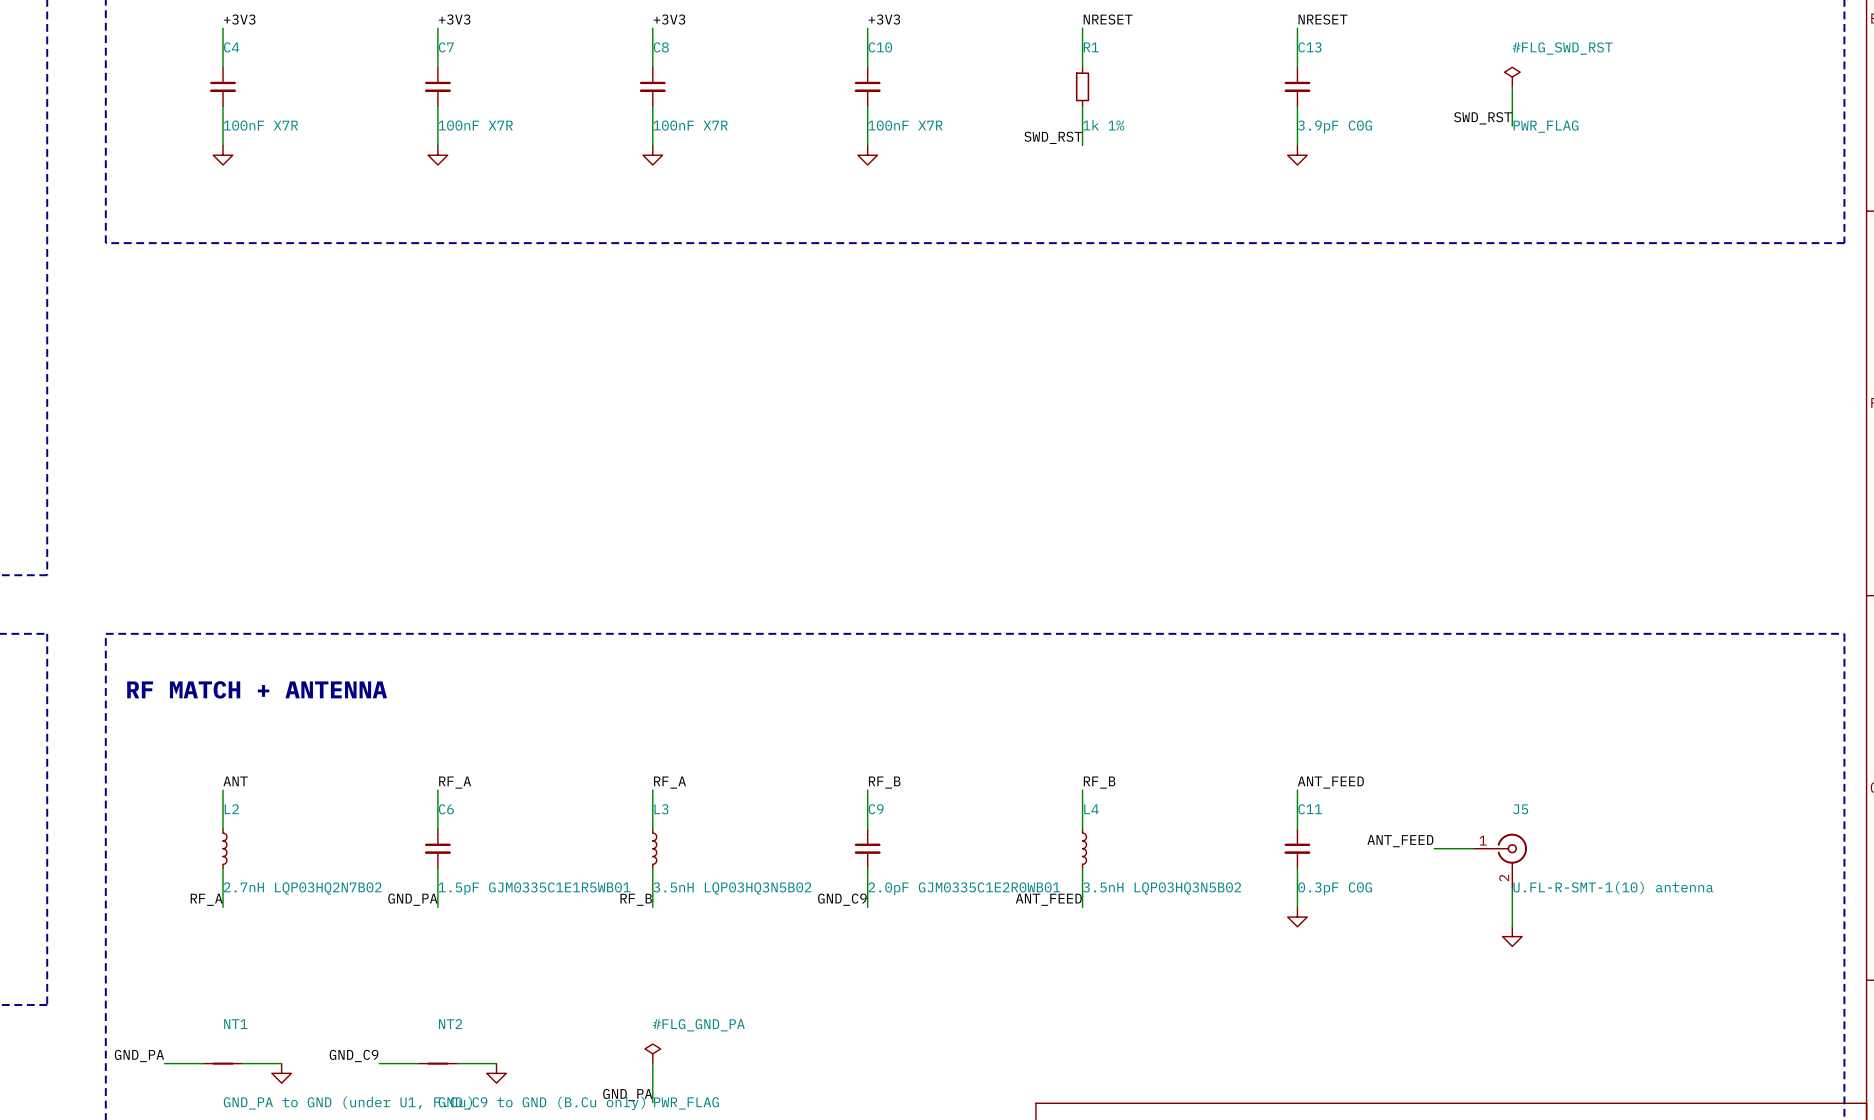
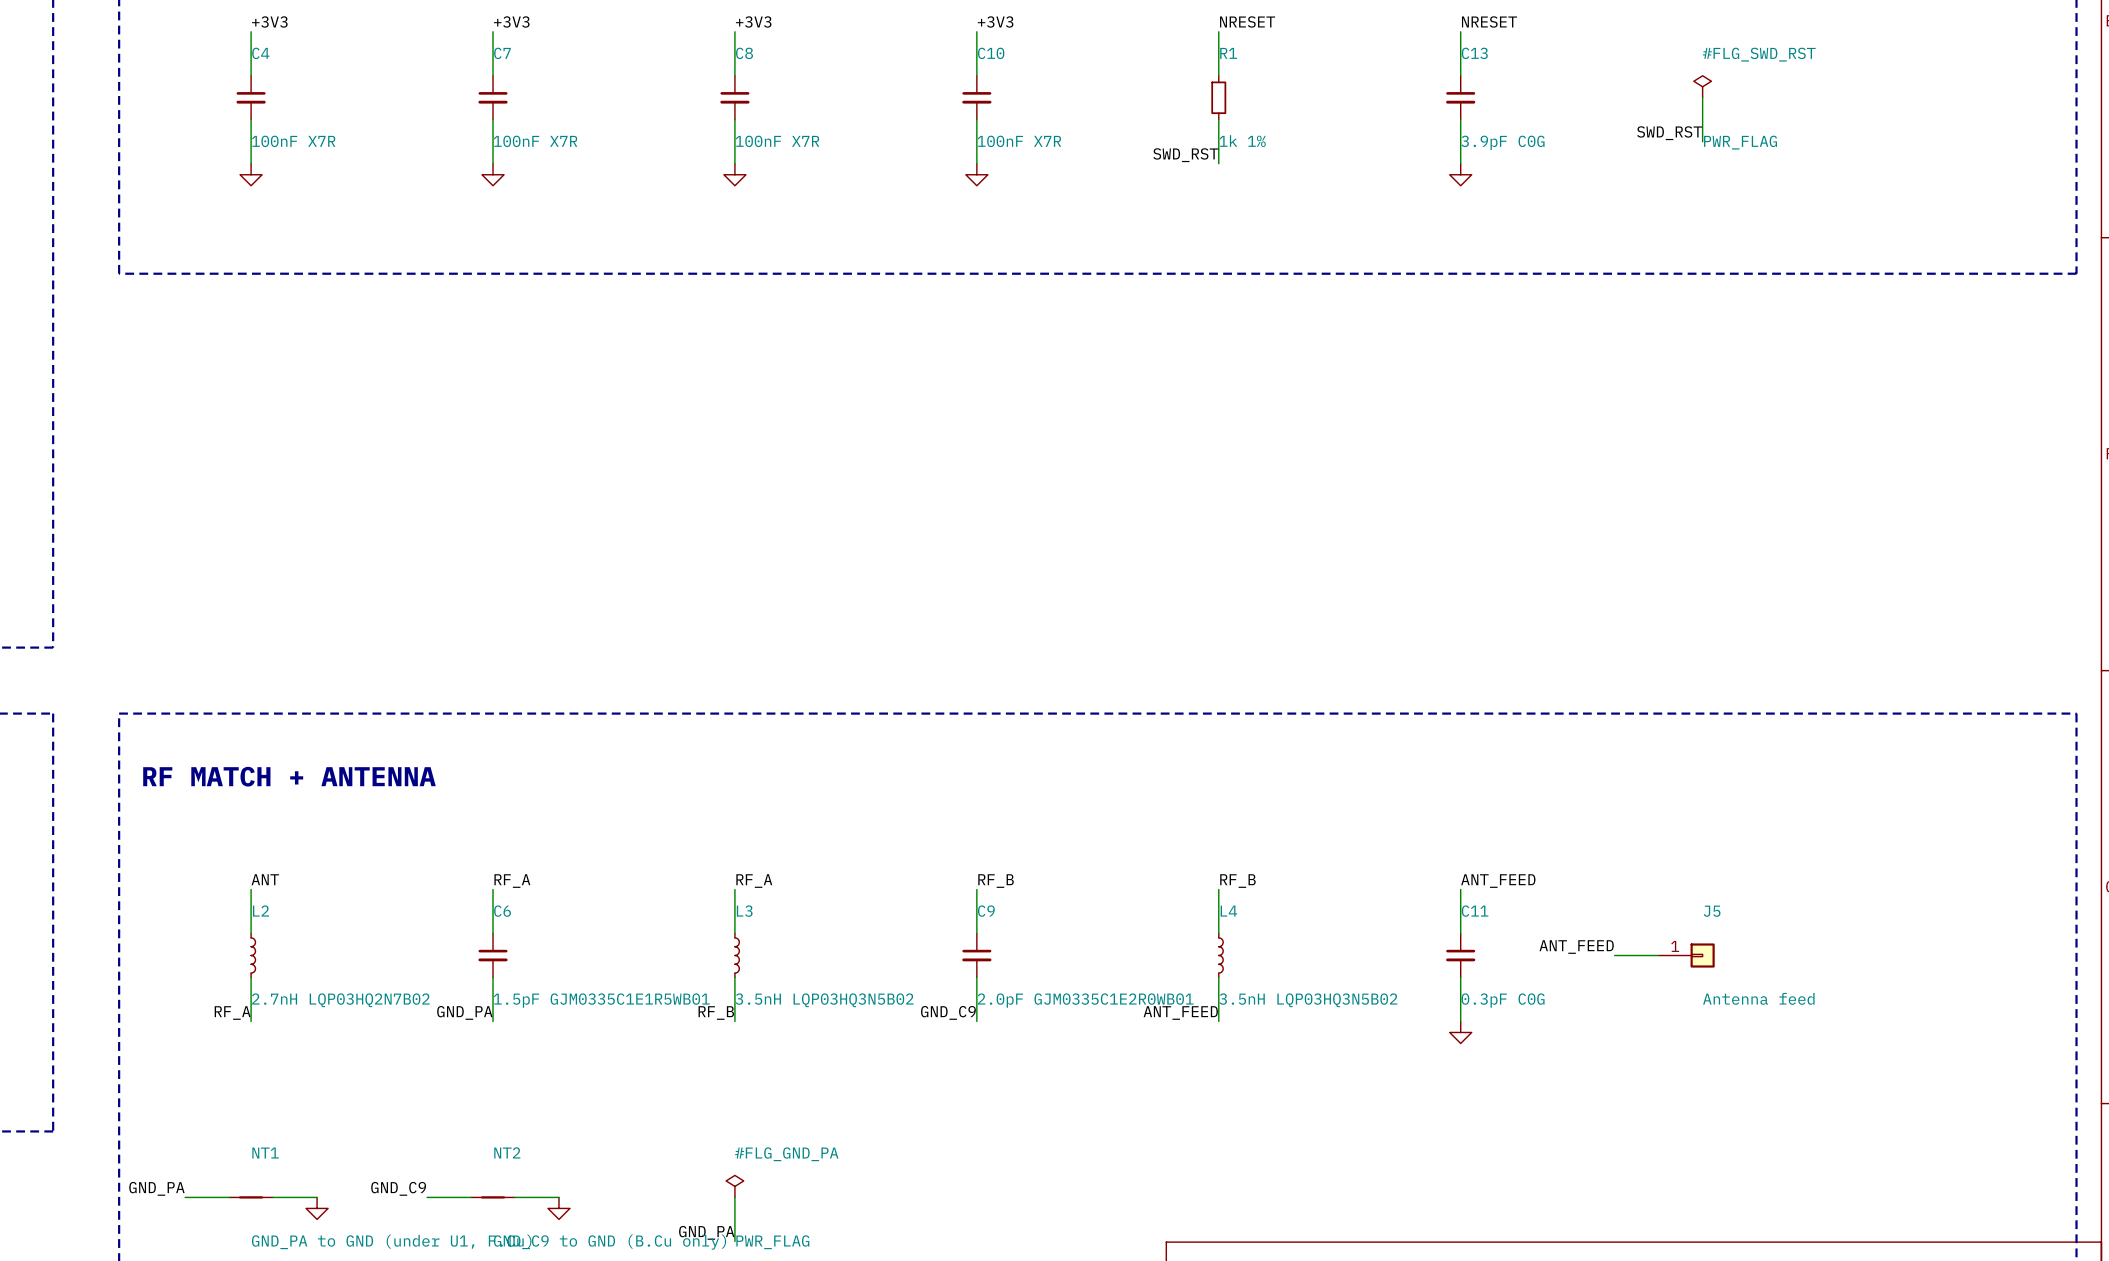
J5 symbol: [1473, 833, 1527, 888] -> [1658, 943, 1715, 968]
wire: (1512, 887) (1512, 926) -> none
J5 value: U.FL-R-SMT-1(10) antenna (1613, 887) -> Antenna feed (1758, 998)
power symbol: (1512, 936) -> none

